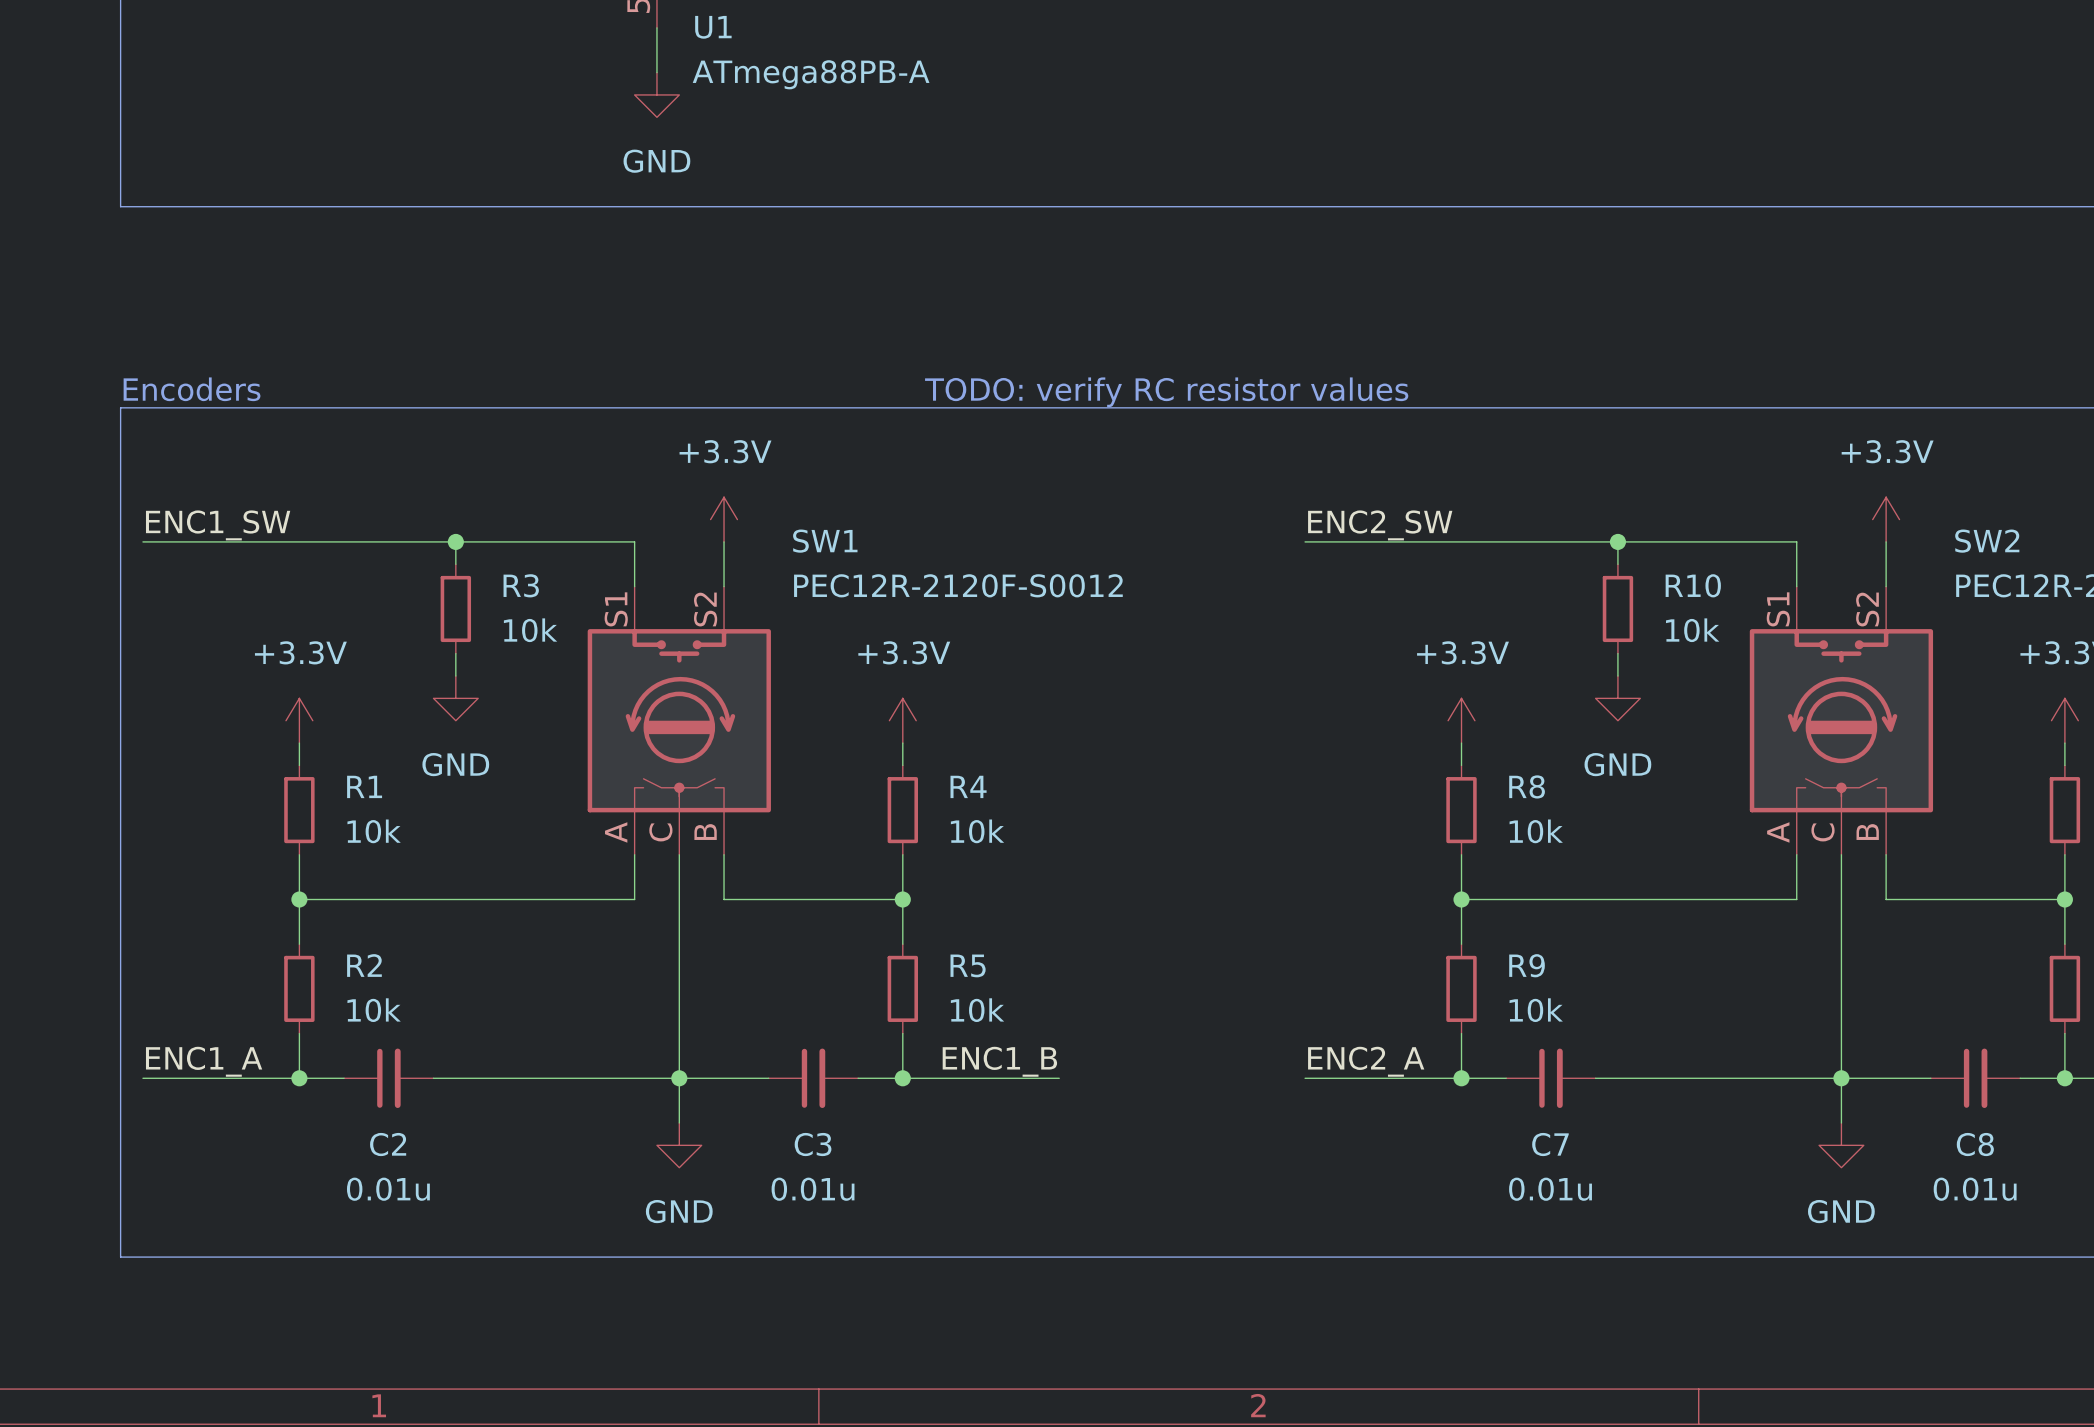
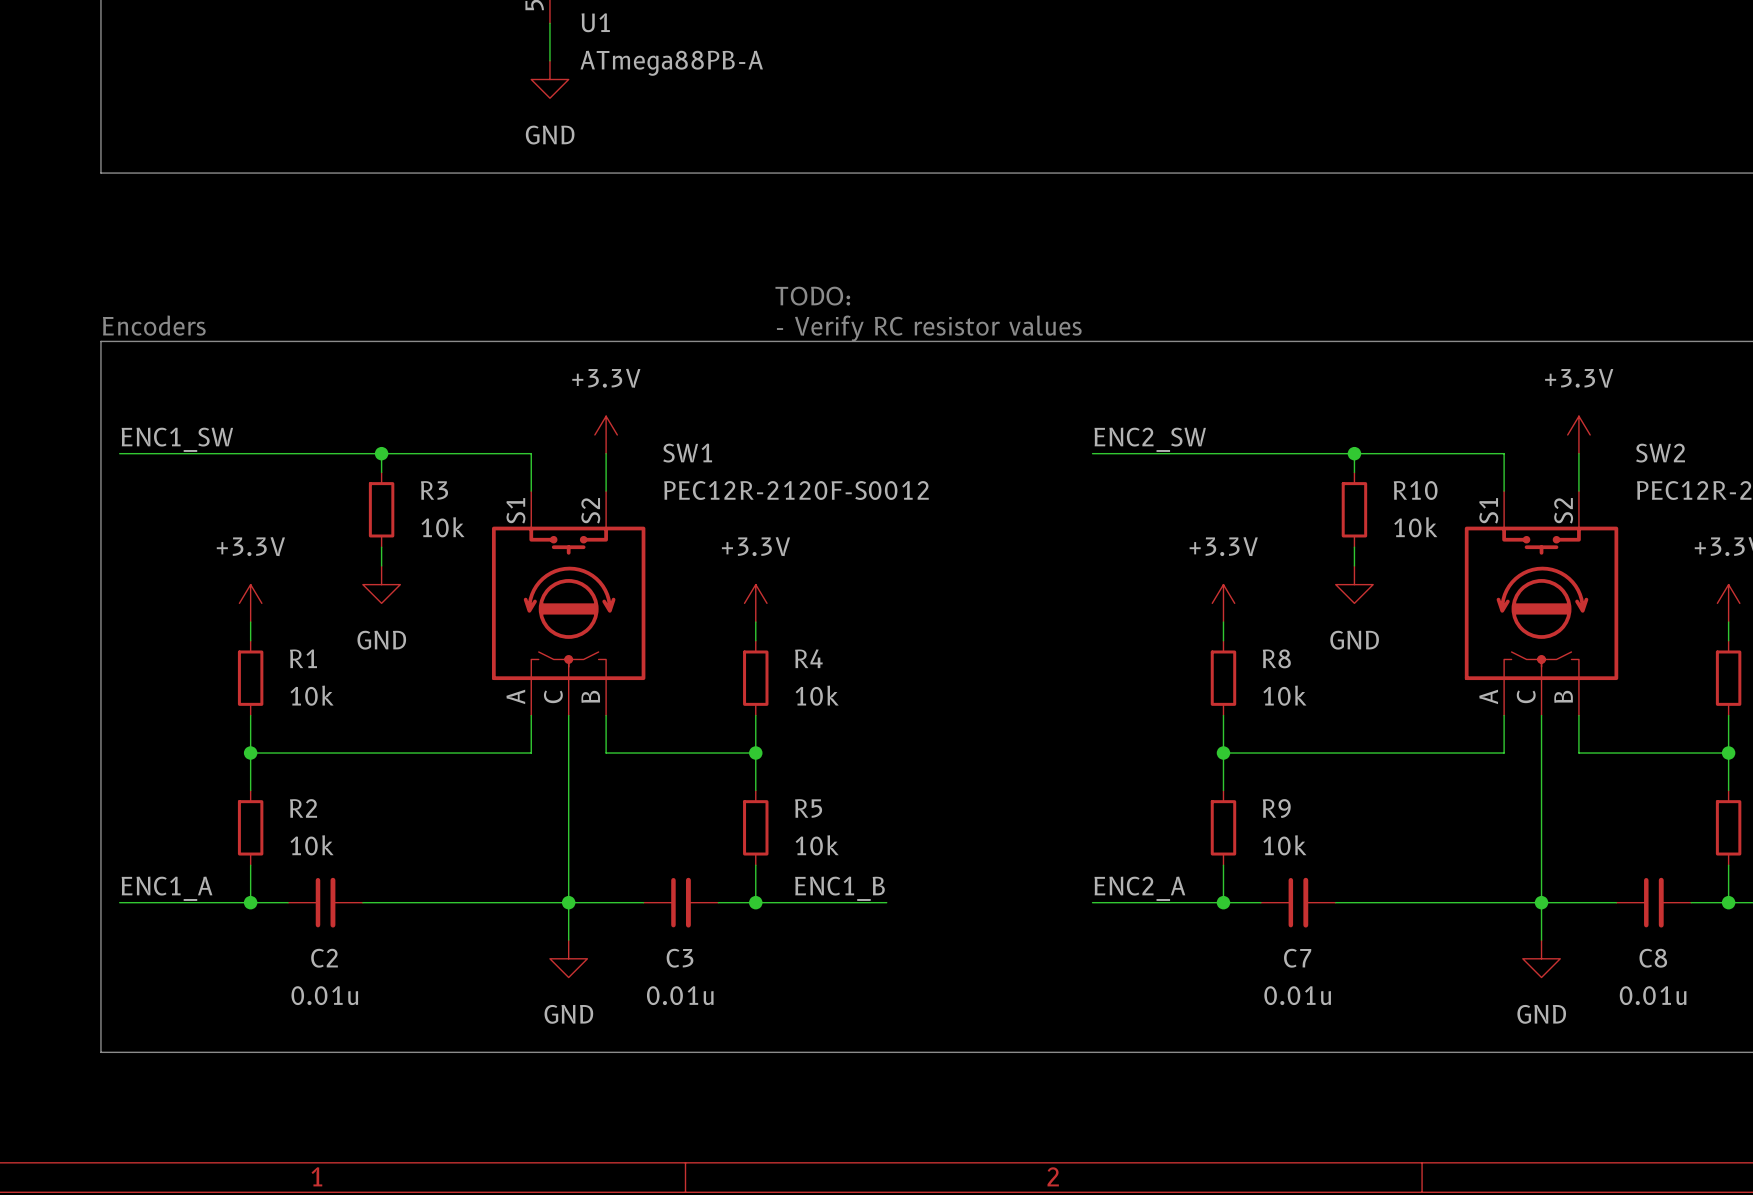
text: none -> TODO: (812, 296)
text: TODO: verify RC resistor values (1166, 392) -> - Verify RC resistor values (929, 328)

